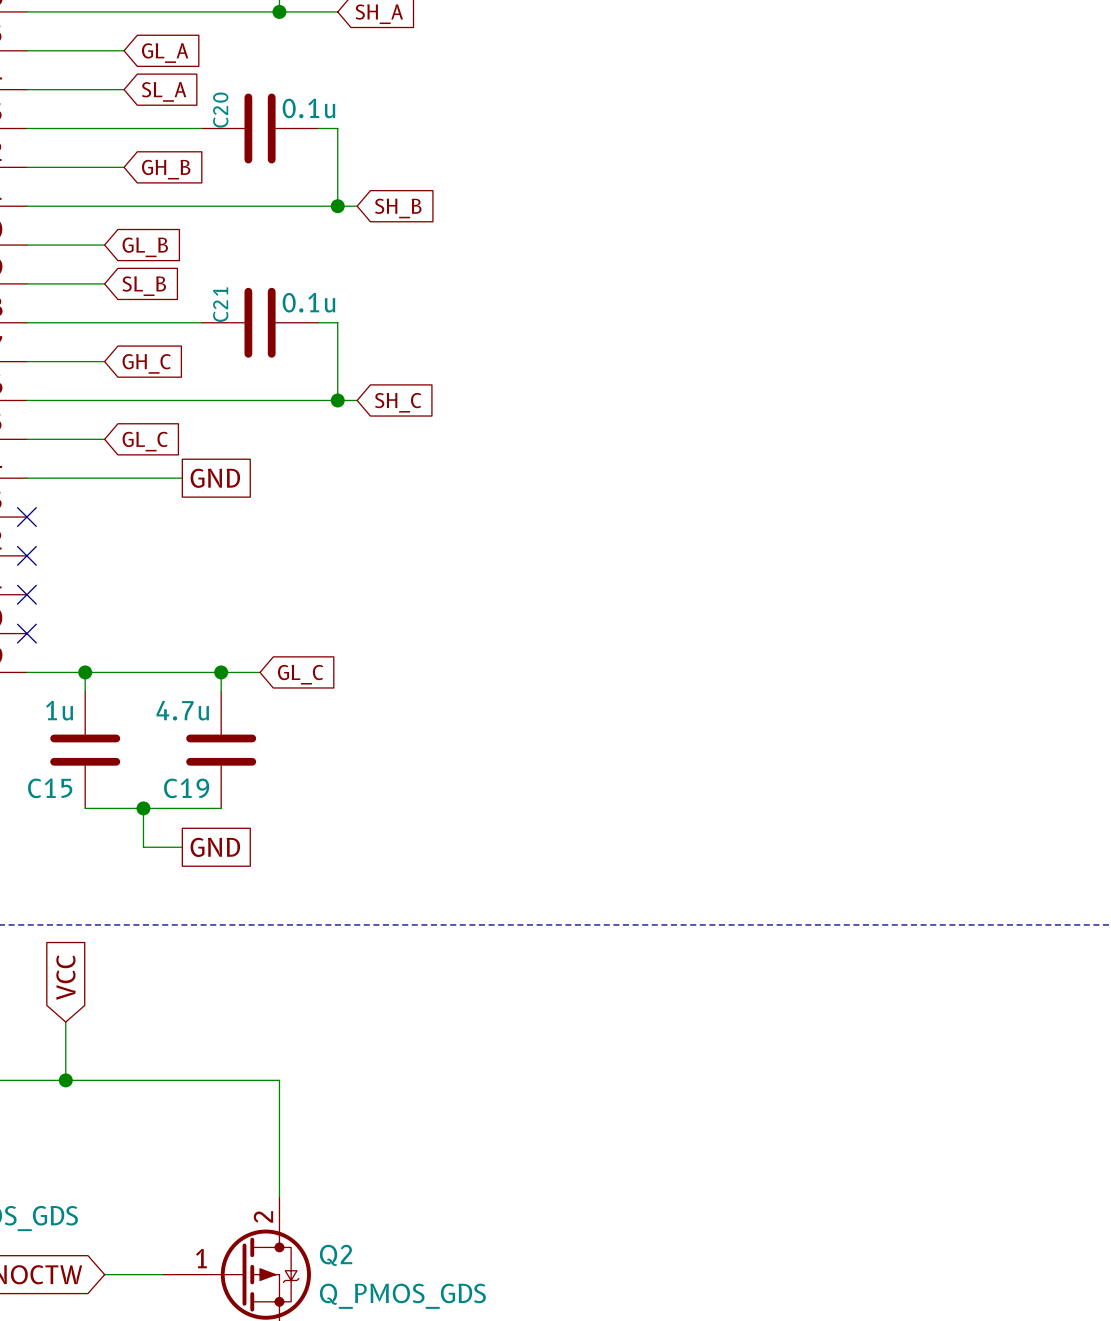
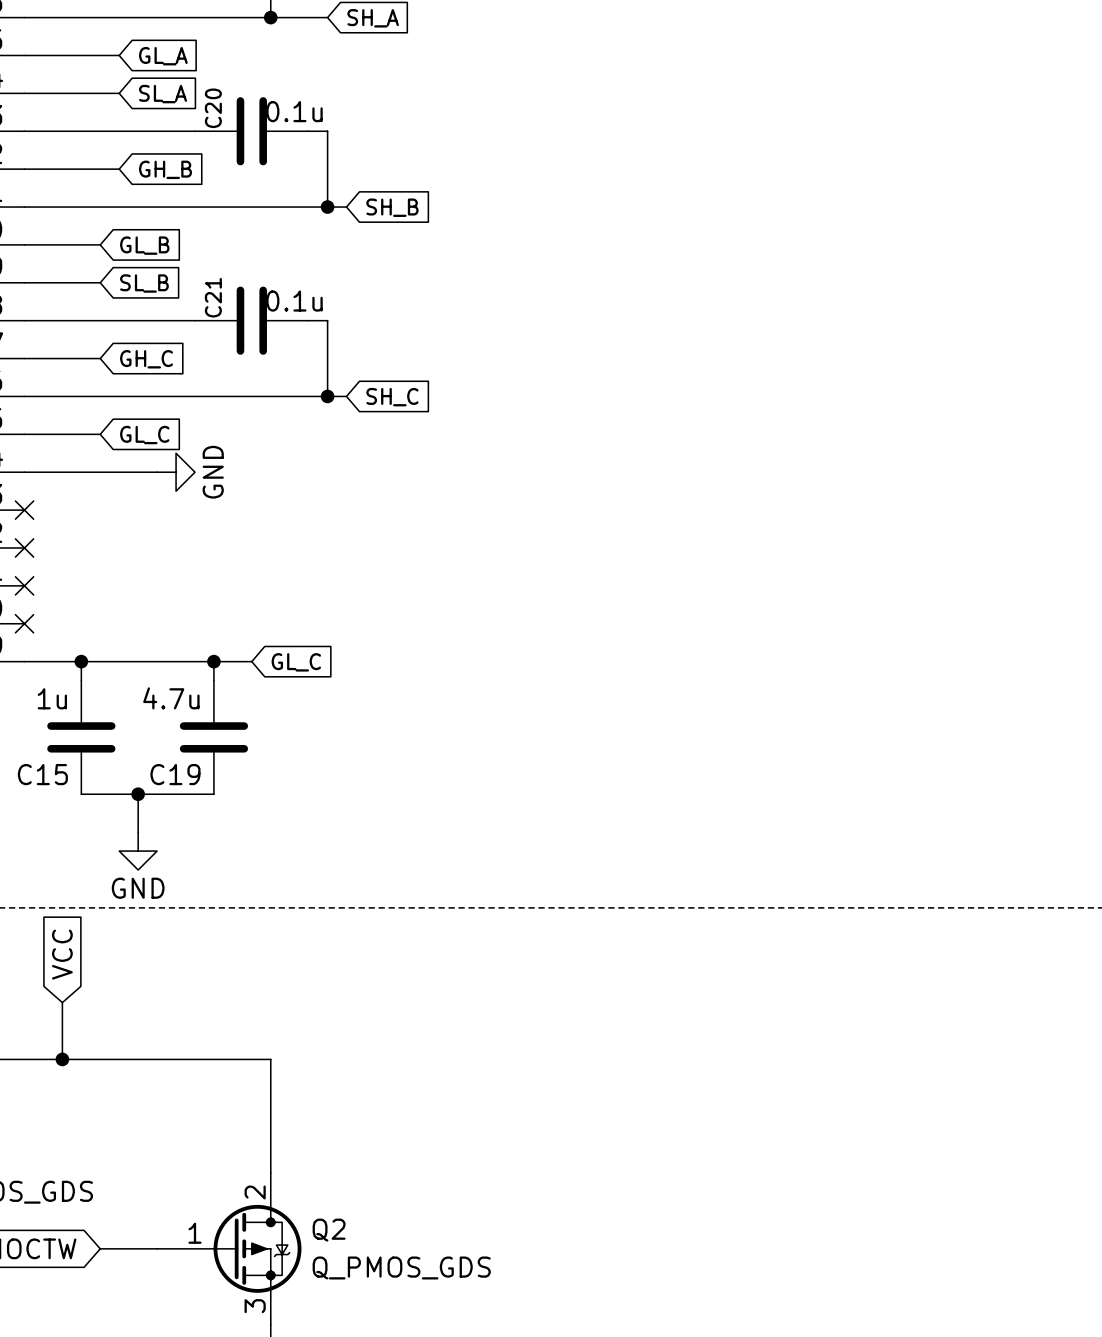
power symbol: none -> GND (176, 472)
global label: GND (215, 478) -> none
wire: (143, 847) (182, 847) -> none
global label: GND (215, 847) -> none
power symbol: none -> GND (138, 851)

